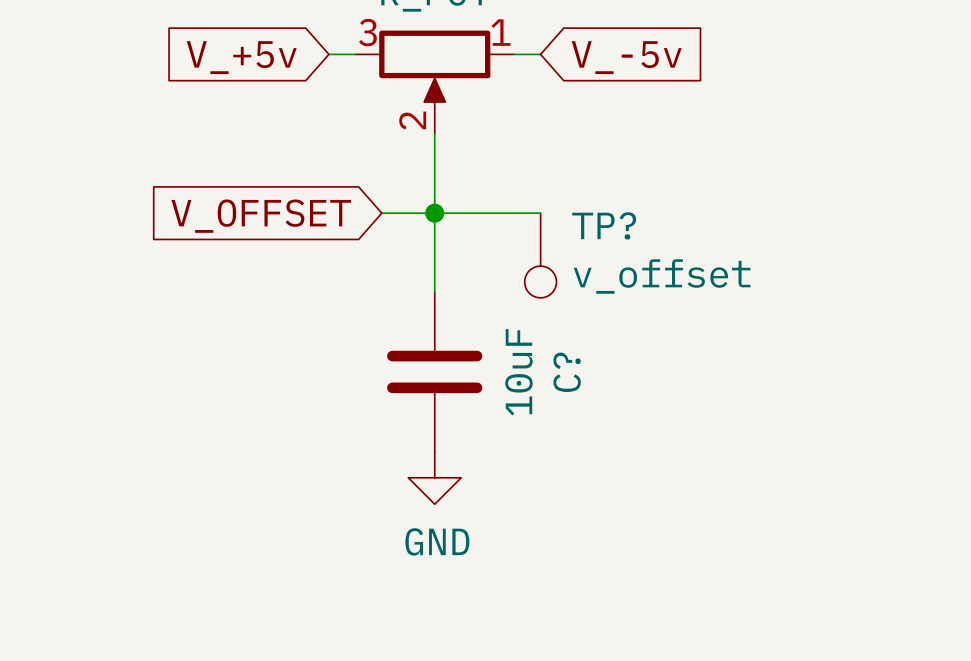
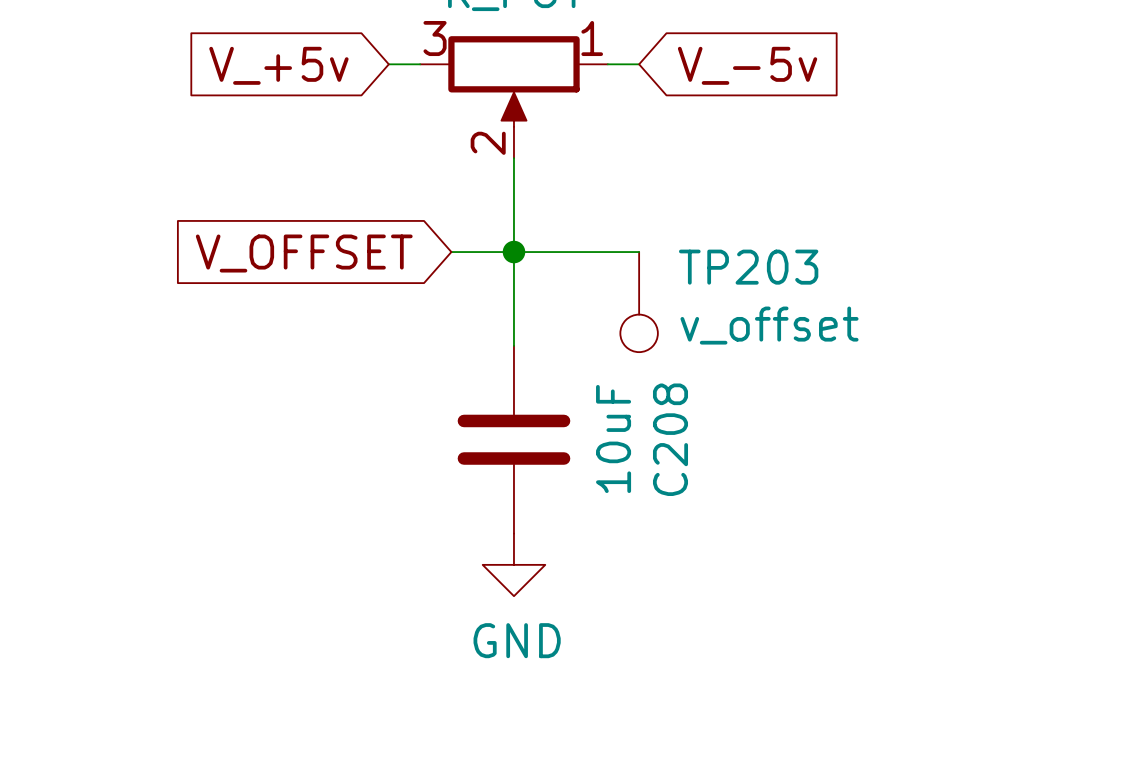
TP? name: TP? (604, 225) -> TP203 (748, 267)
C? name: C? (567, 372) -> C208 (670, 439)

